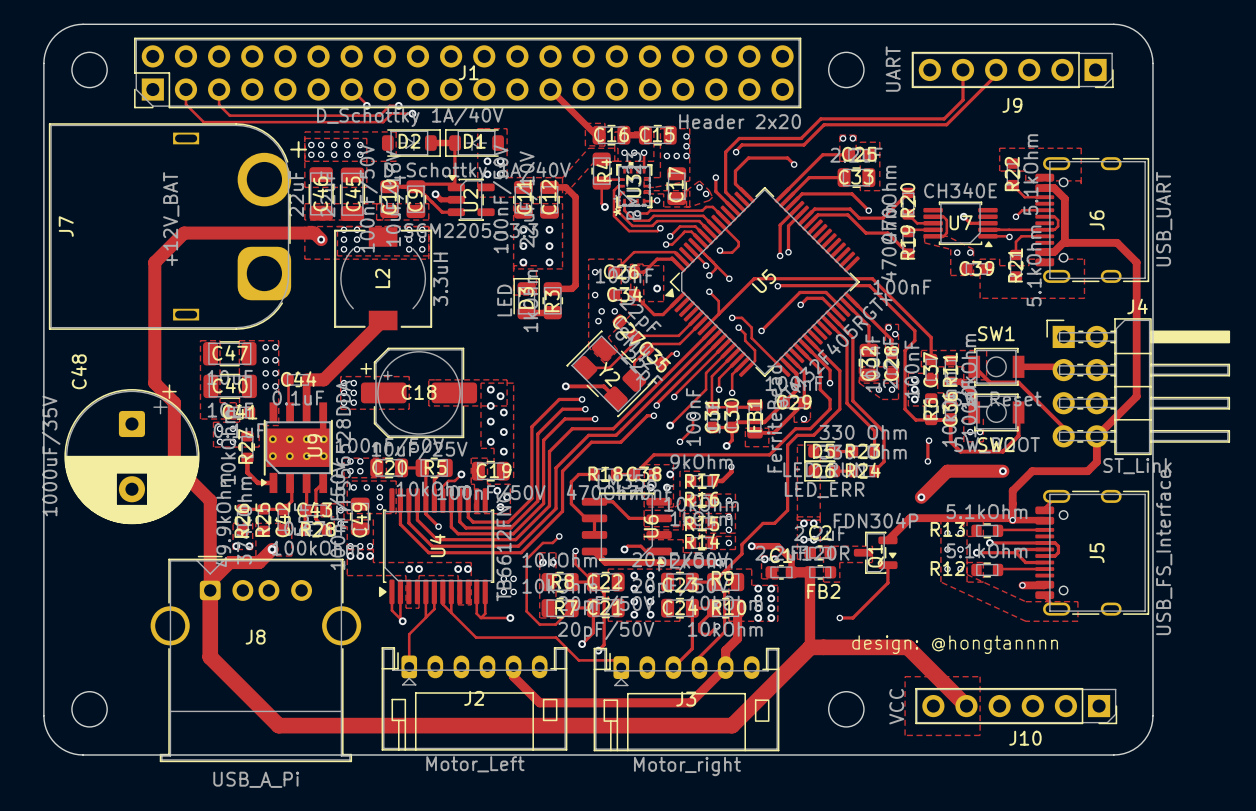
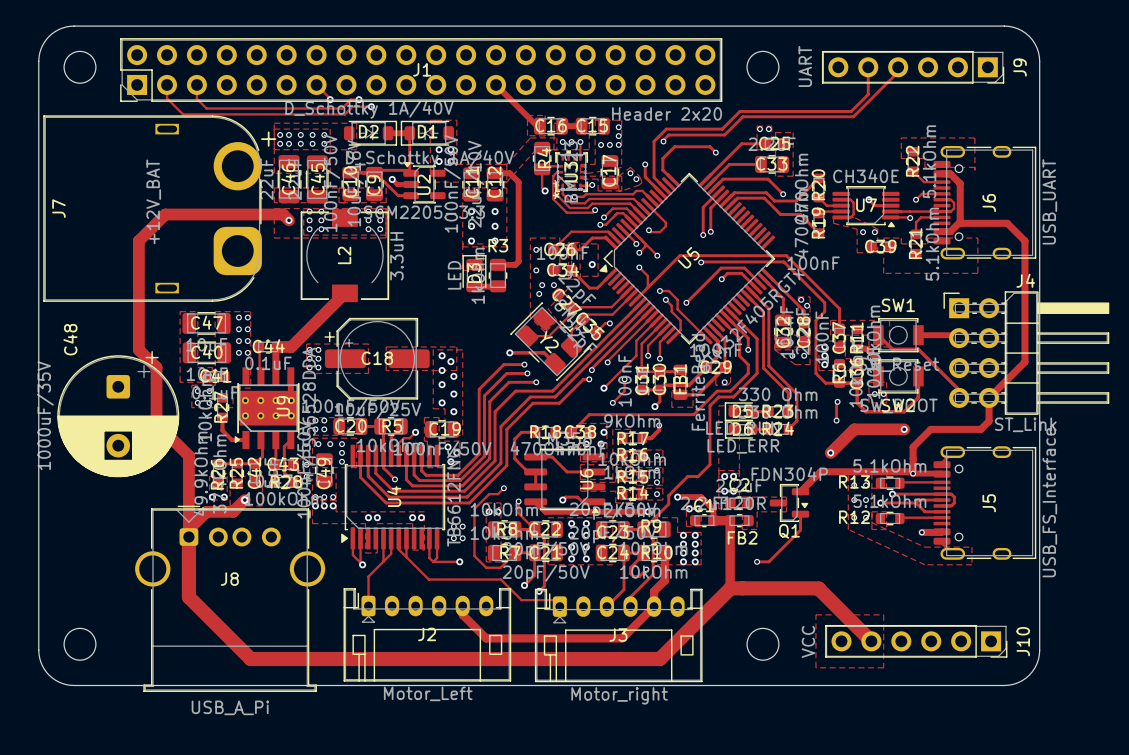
J9 name rotation: 0° (1012, 105) -> 90° counterclockwise (1020, 67)
J9 name position: J9 (1012, 105) -> J9 (1020, 67)
R3 name rotation: 0° (552, 301) -> 90° clockwise (498, 245)
R3 name position: R3 (552, 301) -> R3 (498, 245)
Q1 name rotation: 0° (875, 556) -> 90° clockwise (789, 531)
text: design: @hongtannnn (955, 644) -> none
J10 name rotation: 0° (1025, 738) -> 90° counterclockwise (1023, 641)
J10 name position: J10 (1025, 738) -> J10 (1023, 641)

